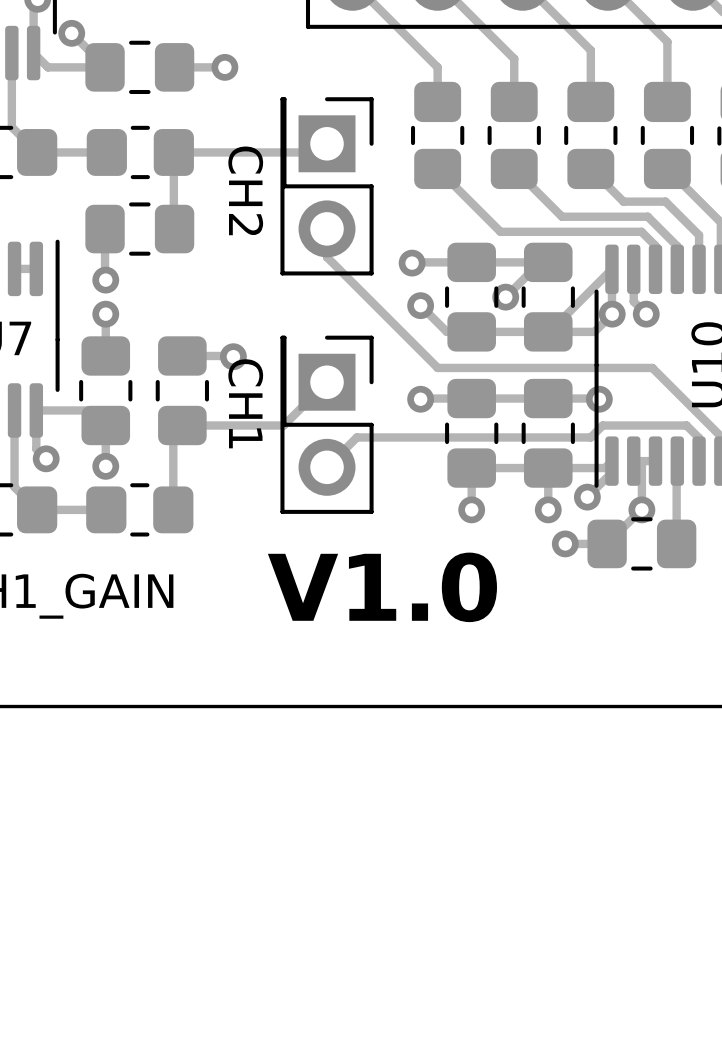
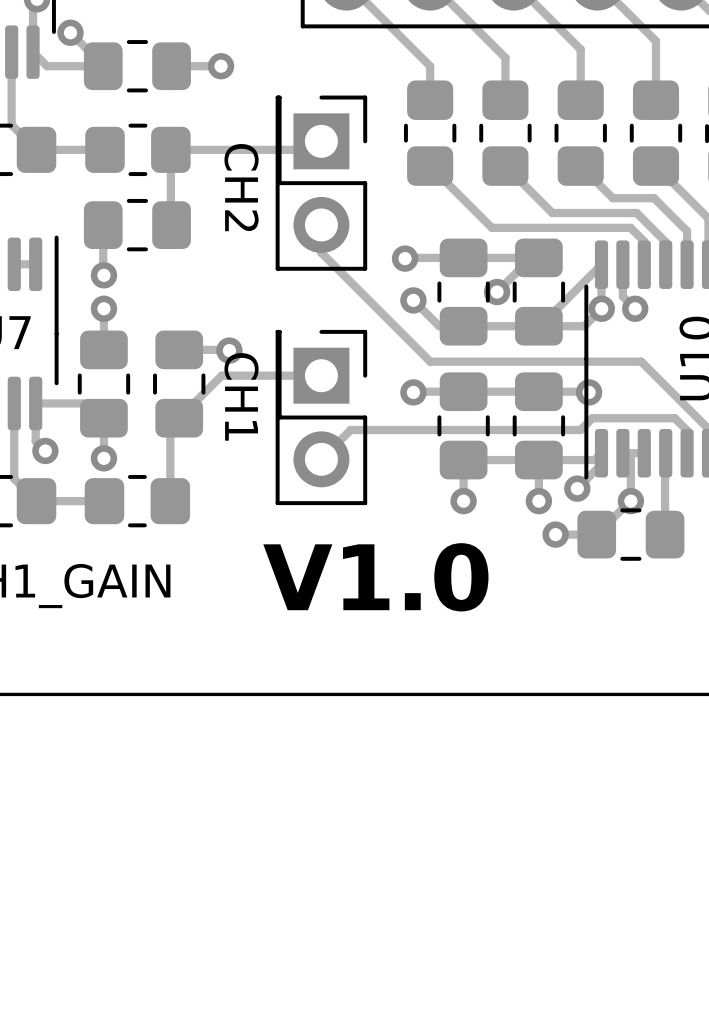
track: (327, 382) (283, 425) (182, 425) -> (321, 375) (221, 375) (179, 418)

